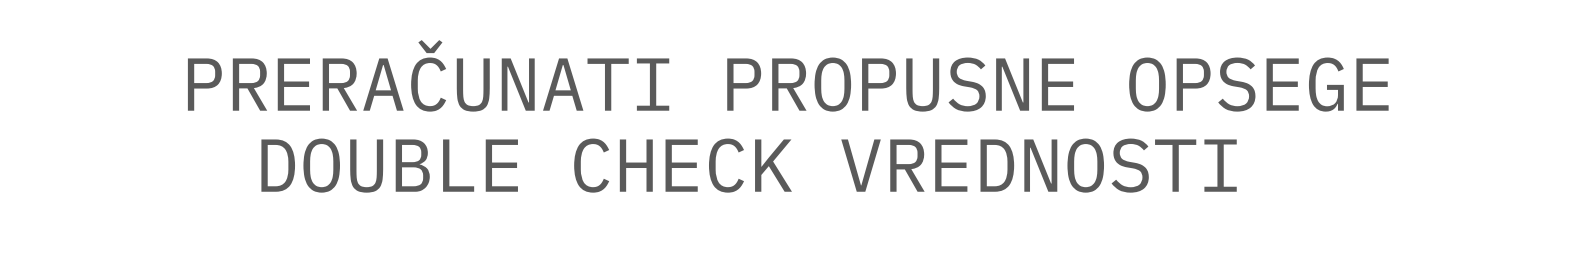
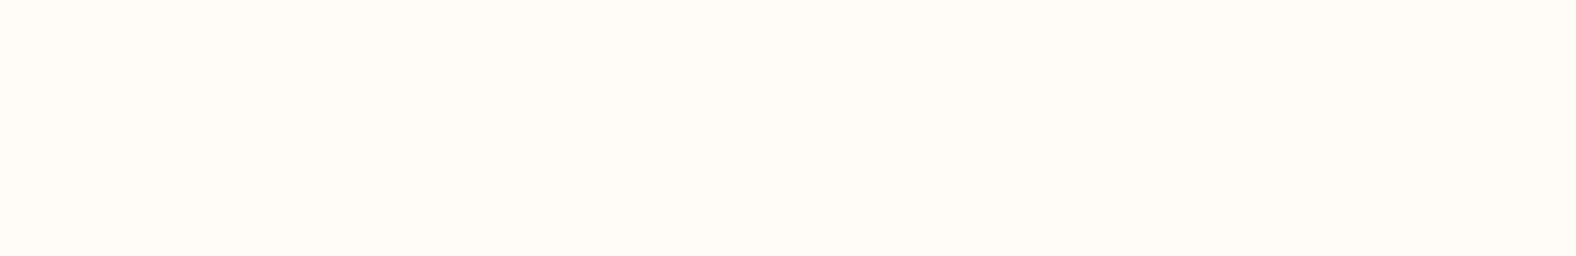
text: PRERAČUNATI PROPUSNE OPSEGE (788, 75) -> none
text: DOUBLE CHECK VREDNOSTI (749, 165) -> none

